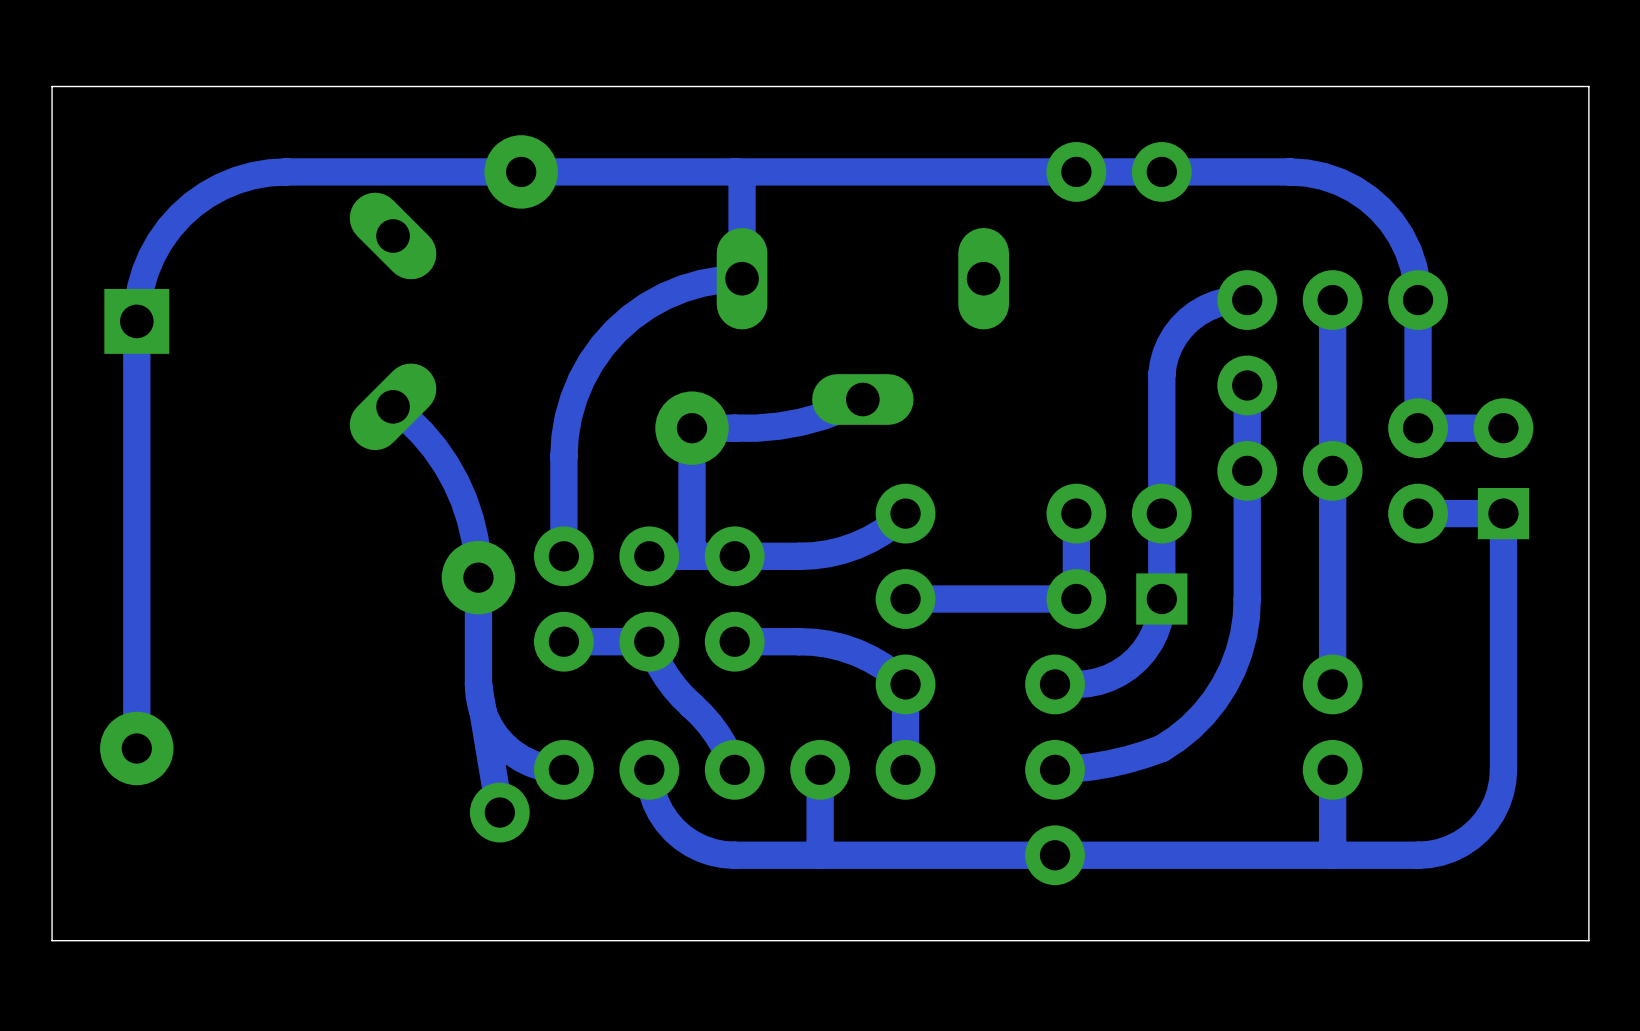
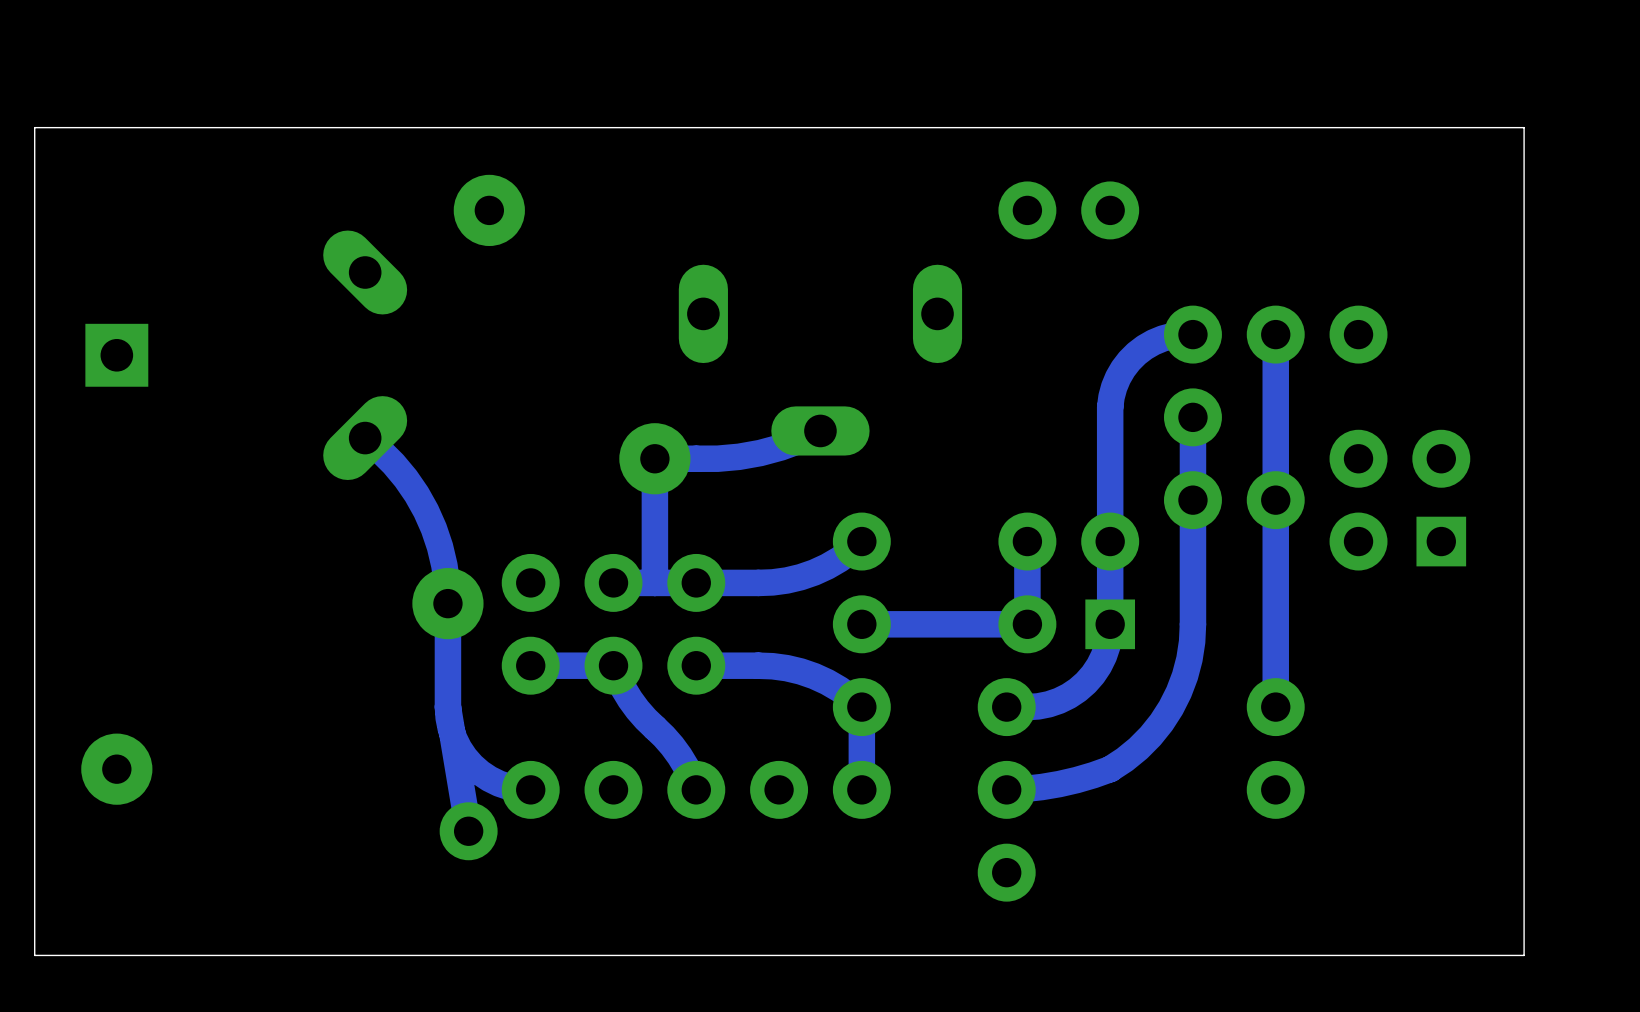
bottom track: (734, 171) (739, 173) (741, 178) (742, 278) (702, 283) (664, 296) (647, 306) (616, 330) (591, 362) (581, 379) (568, 417) (565, 436) (563, 556) -> none
bottom track: (1503, 428) (1418, 428) (1418, 300) (1413, 266) (1408, 251) (1400, 235) (1380, 209) (1353, 189) (1323, 176) (1289, 171) (286, 171) (253, 175) (221, 186) (206, 194) (180, 215) (159, 241) (145, 272) (140, 288) (136, 321) (136, 748) -> none
bottom track: (1418, 513) (1503, 513) (1502, 781) (1492, 812) (1478, 830) (1460, 843) (1440, 852) (1418, 855) (723, 854) (702, 848) (674, 830) (655, 802) (649, 769) -> none
bottom track: (820, 769) (820, 855) -> none
bottom track: (1332, 769) (1332, 855) -> none

